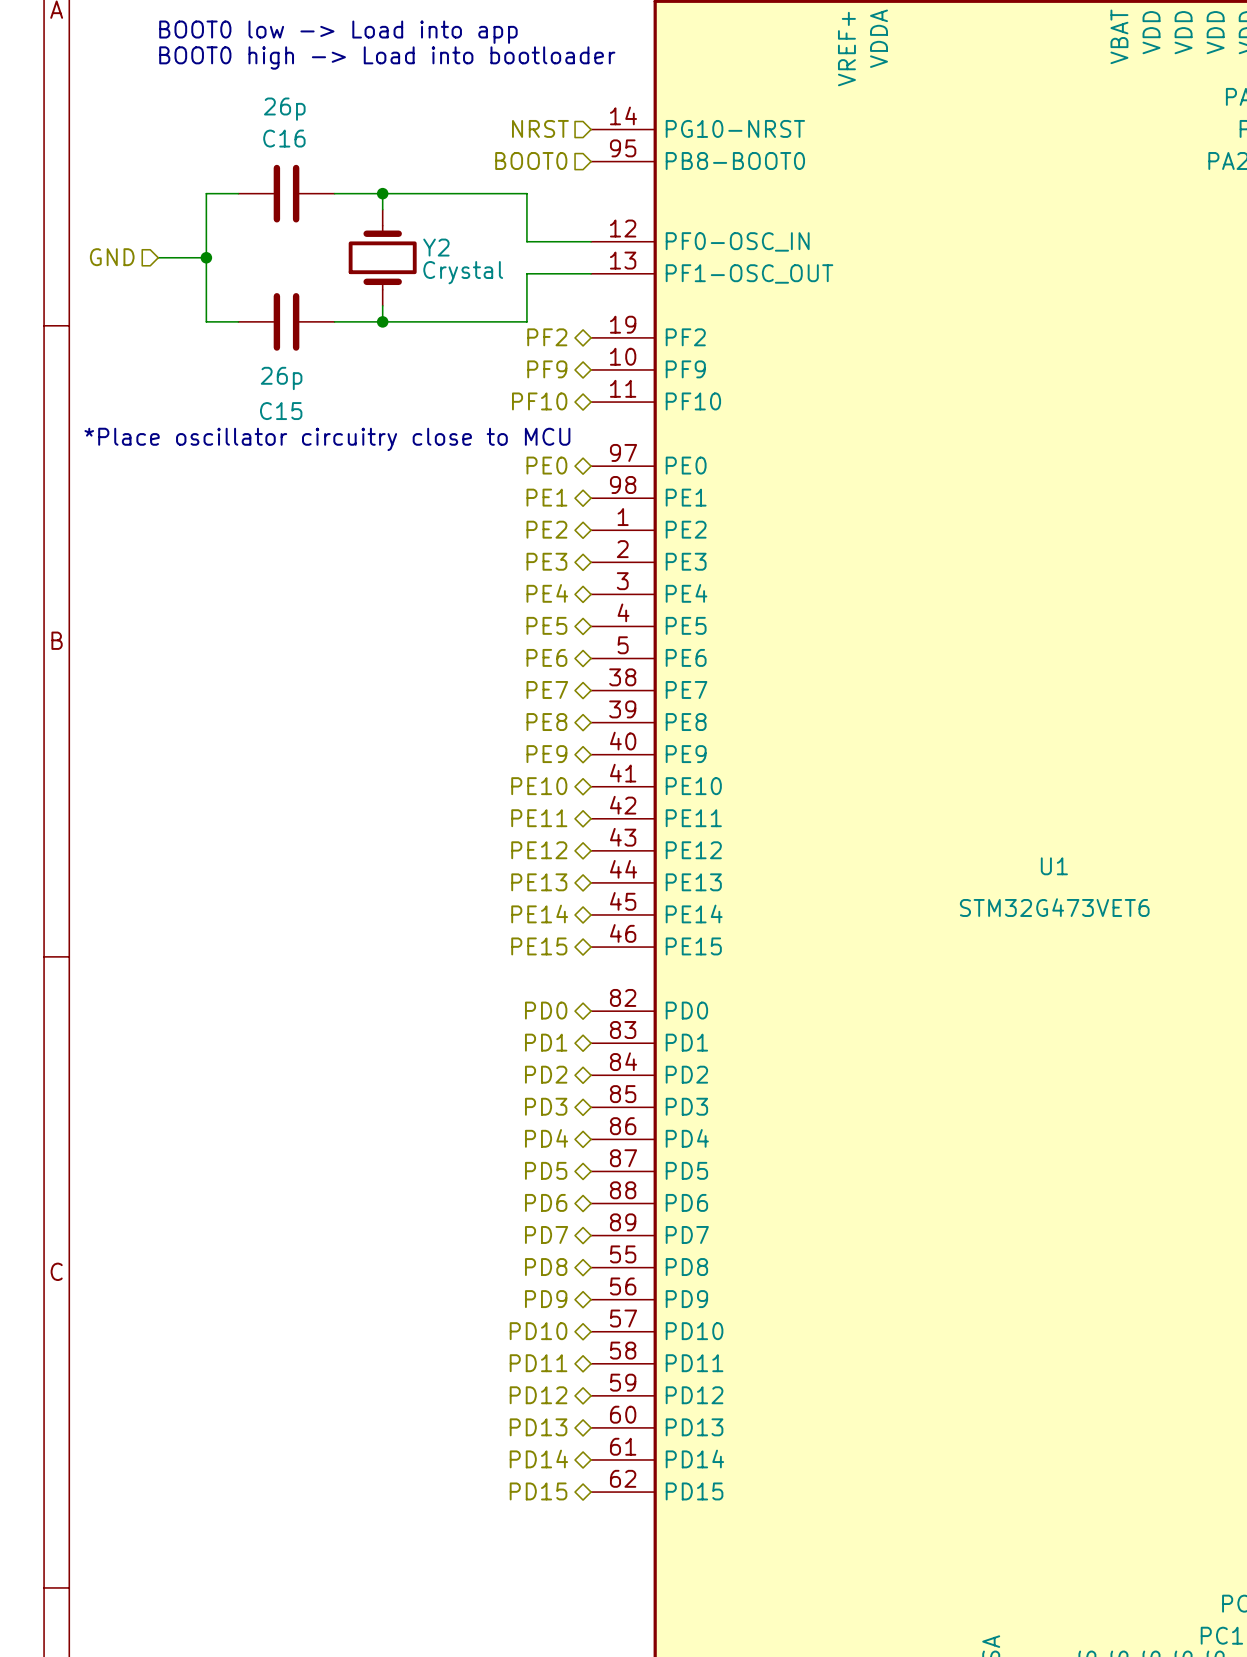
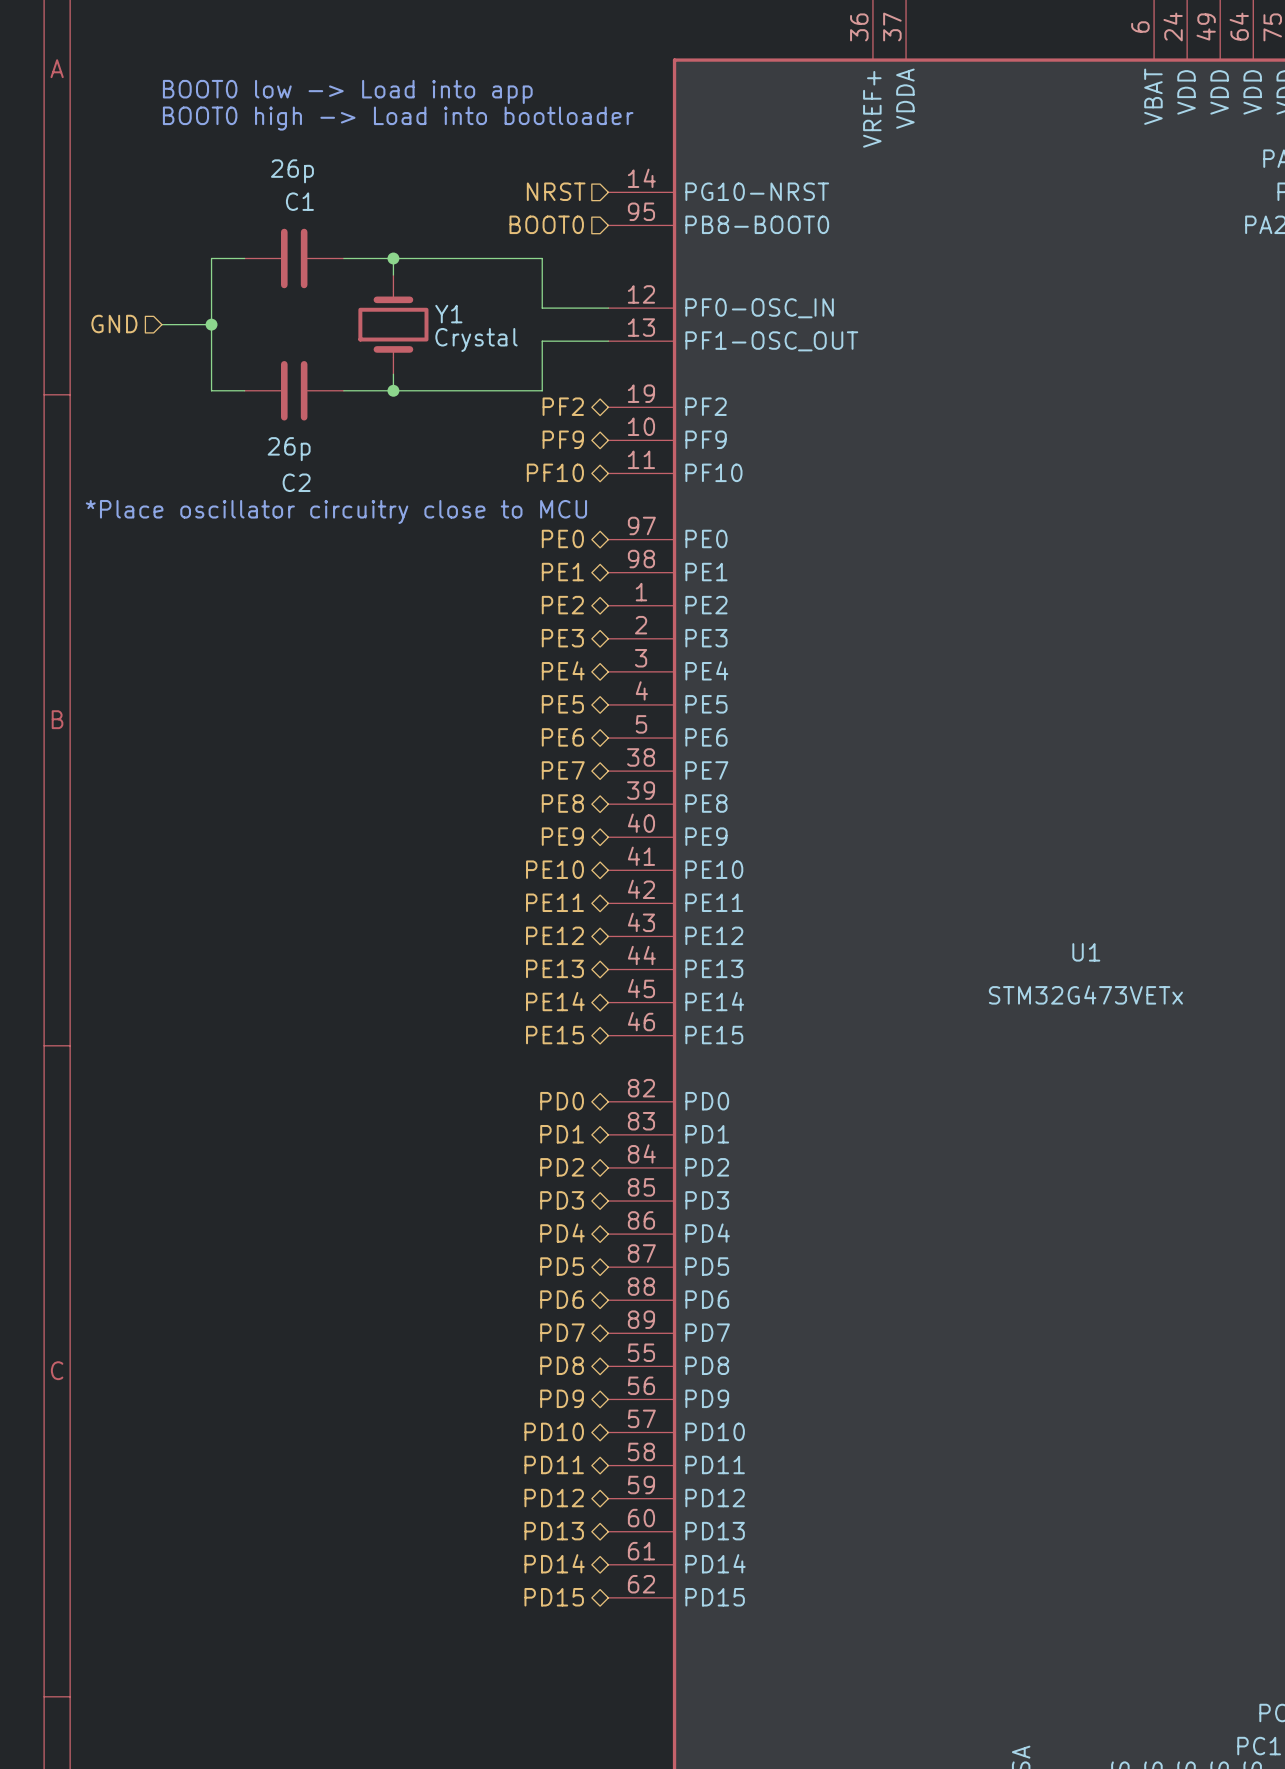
C16 name: C16 (284, 138) -> C1 (299, 201)
Y2 name: Y2 (436, 247) -> Y1 (448, 314)
C15 name: C15 (281, 411) -> C2 (296, 482)
U1 value: STM32G473VET6 (1054, 907) -> STM32G473VETx (1085, 994)

